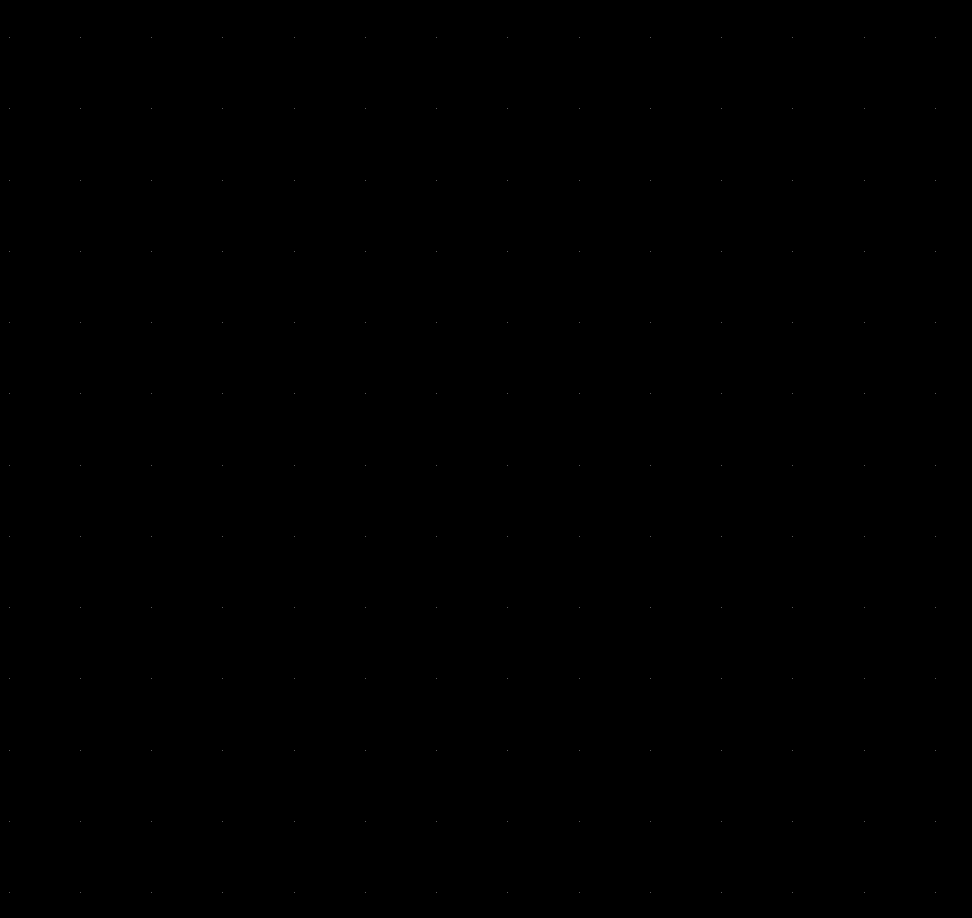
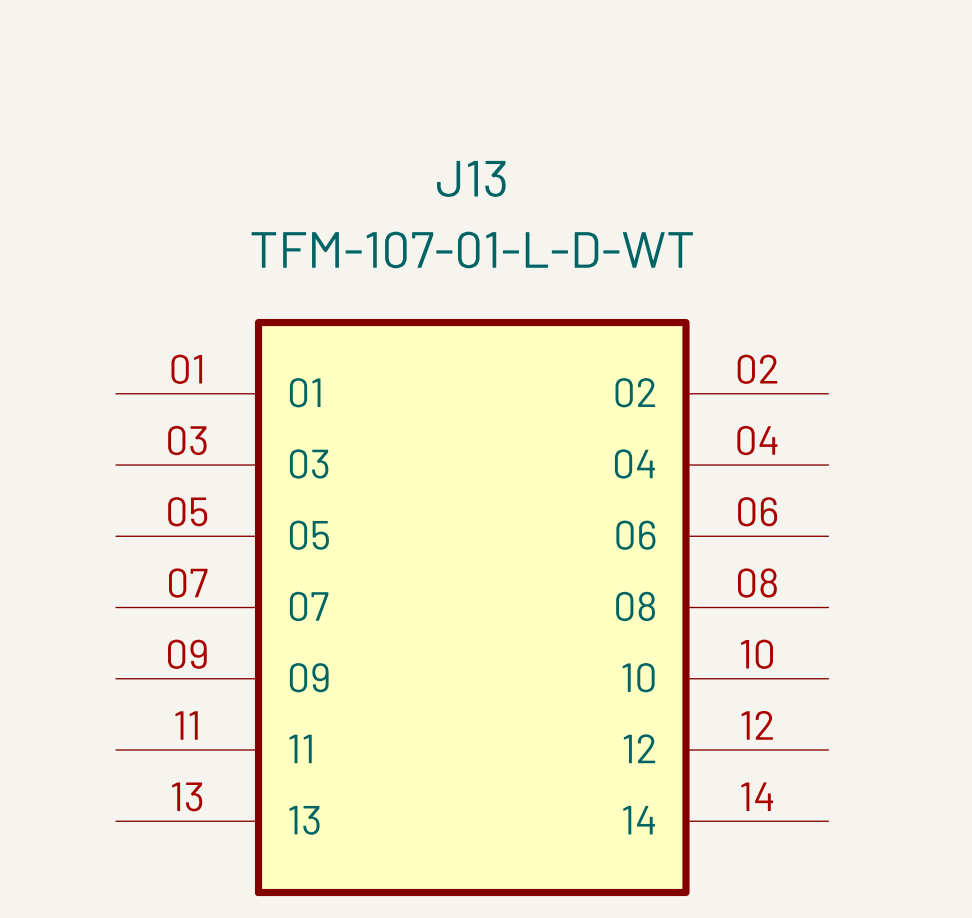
J13: none -> TFM-107-01-L-D-WT (472, 607)

